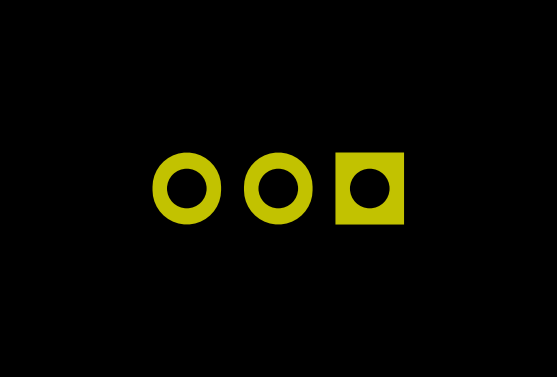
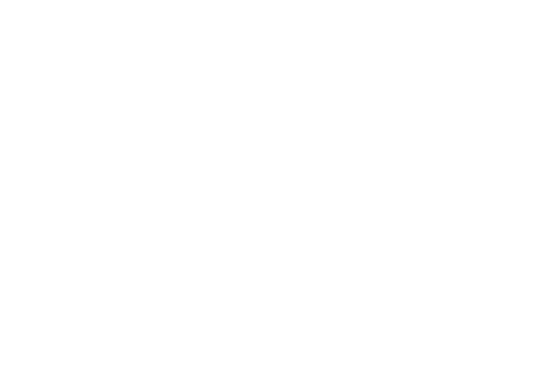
part: (278, 188) -> none

